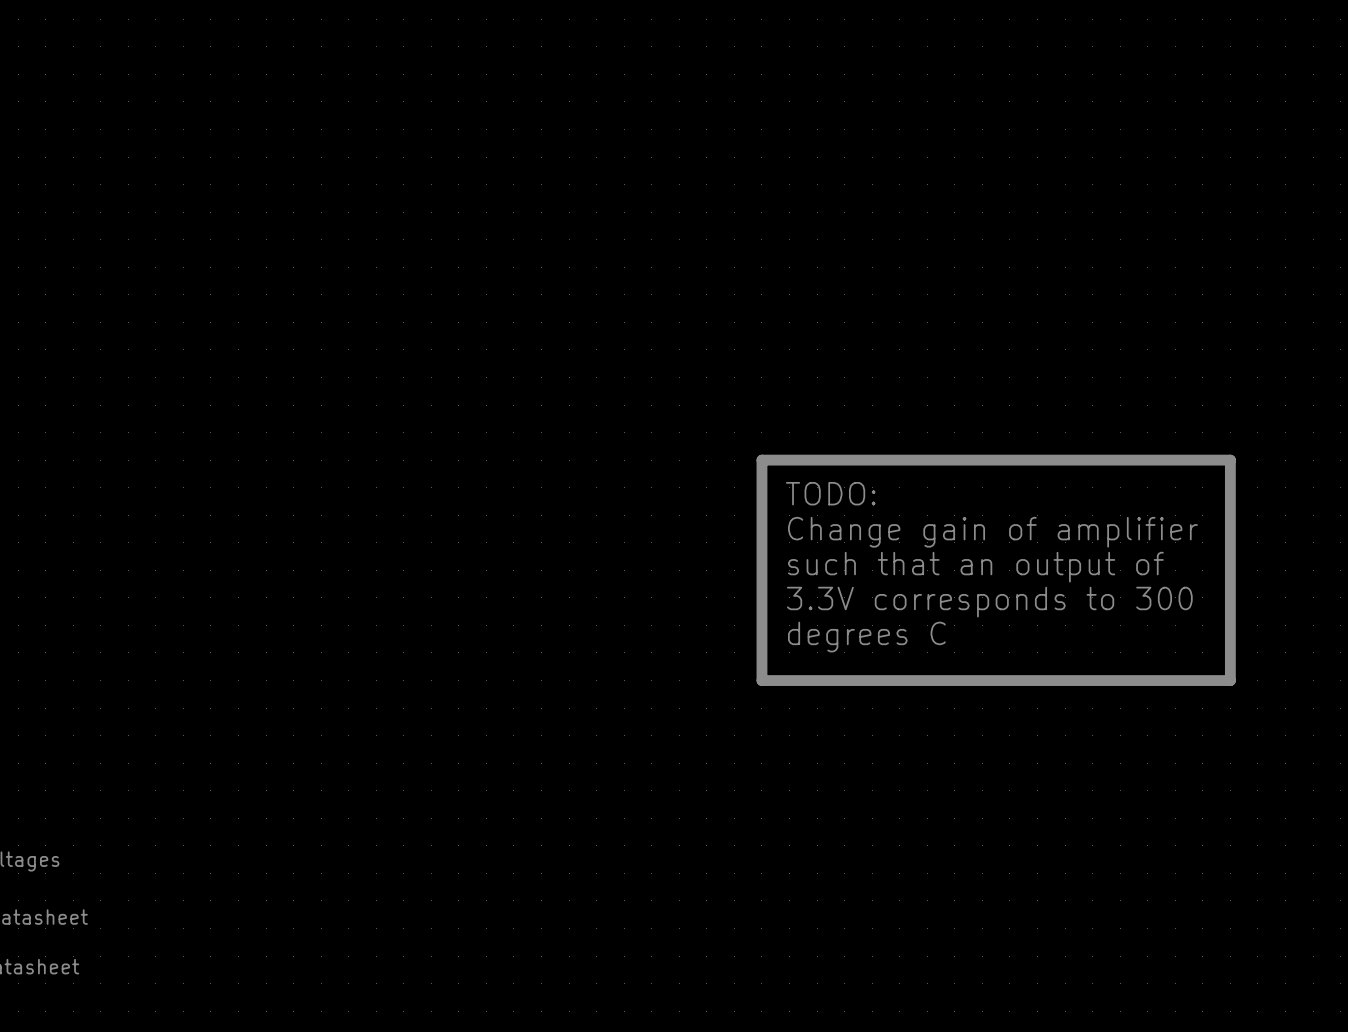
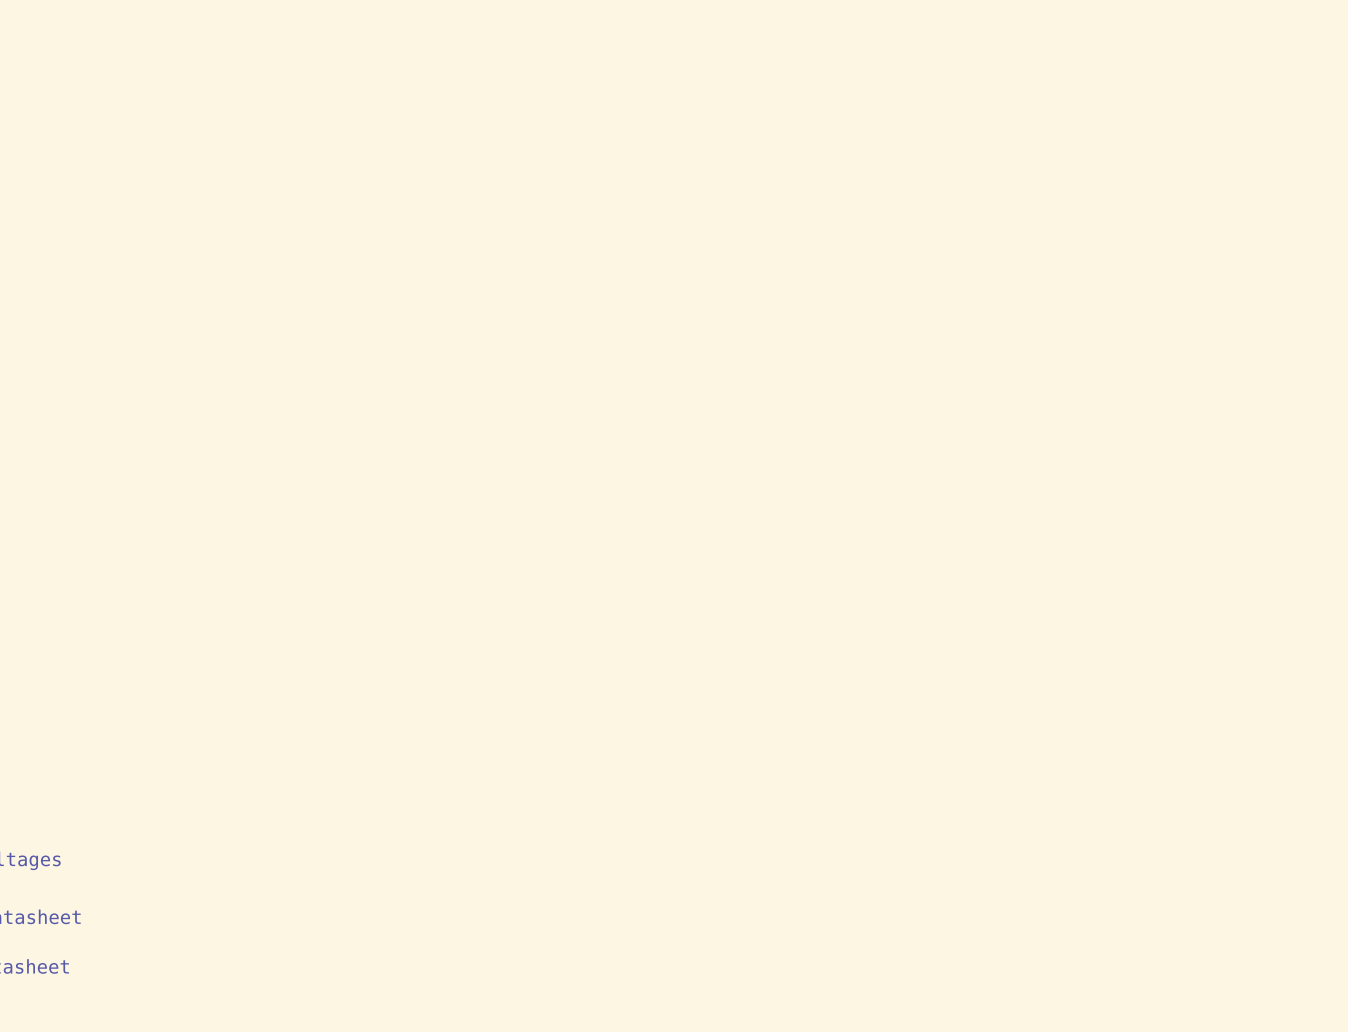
line: (761, 460) (1230, 460) (1230, 680) (761, 680) (761, 460) -> none
text: TODO: (830, 493) -> none
text: Change gain of amplifier (992, 532) -> none
text: such that an output of (975, 567) -> none
text: 3.3V corresponds to 300 (989, 602) -> none
text: degrees C (866, 637) -> none

